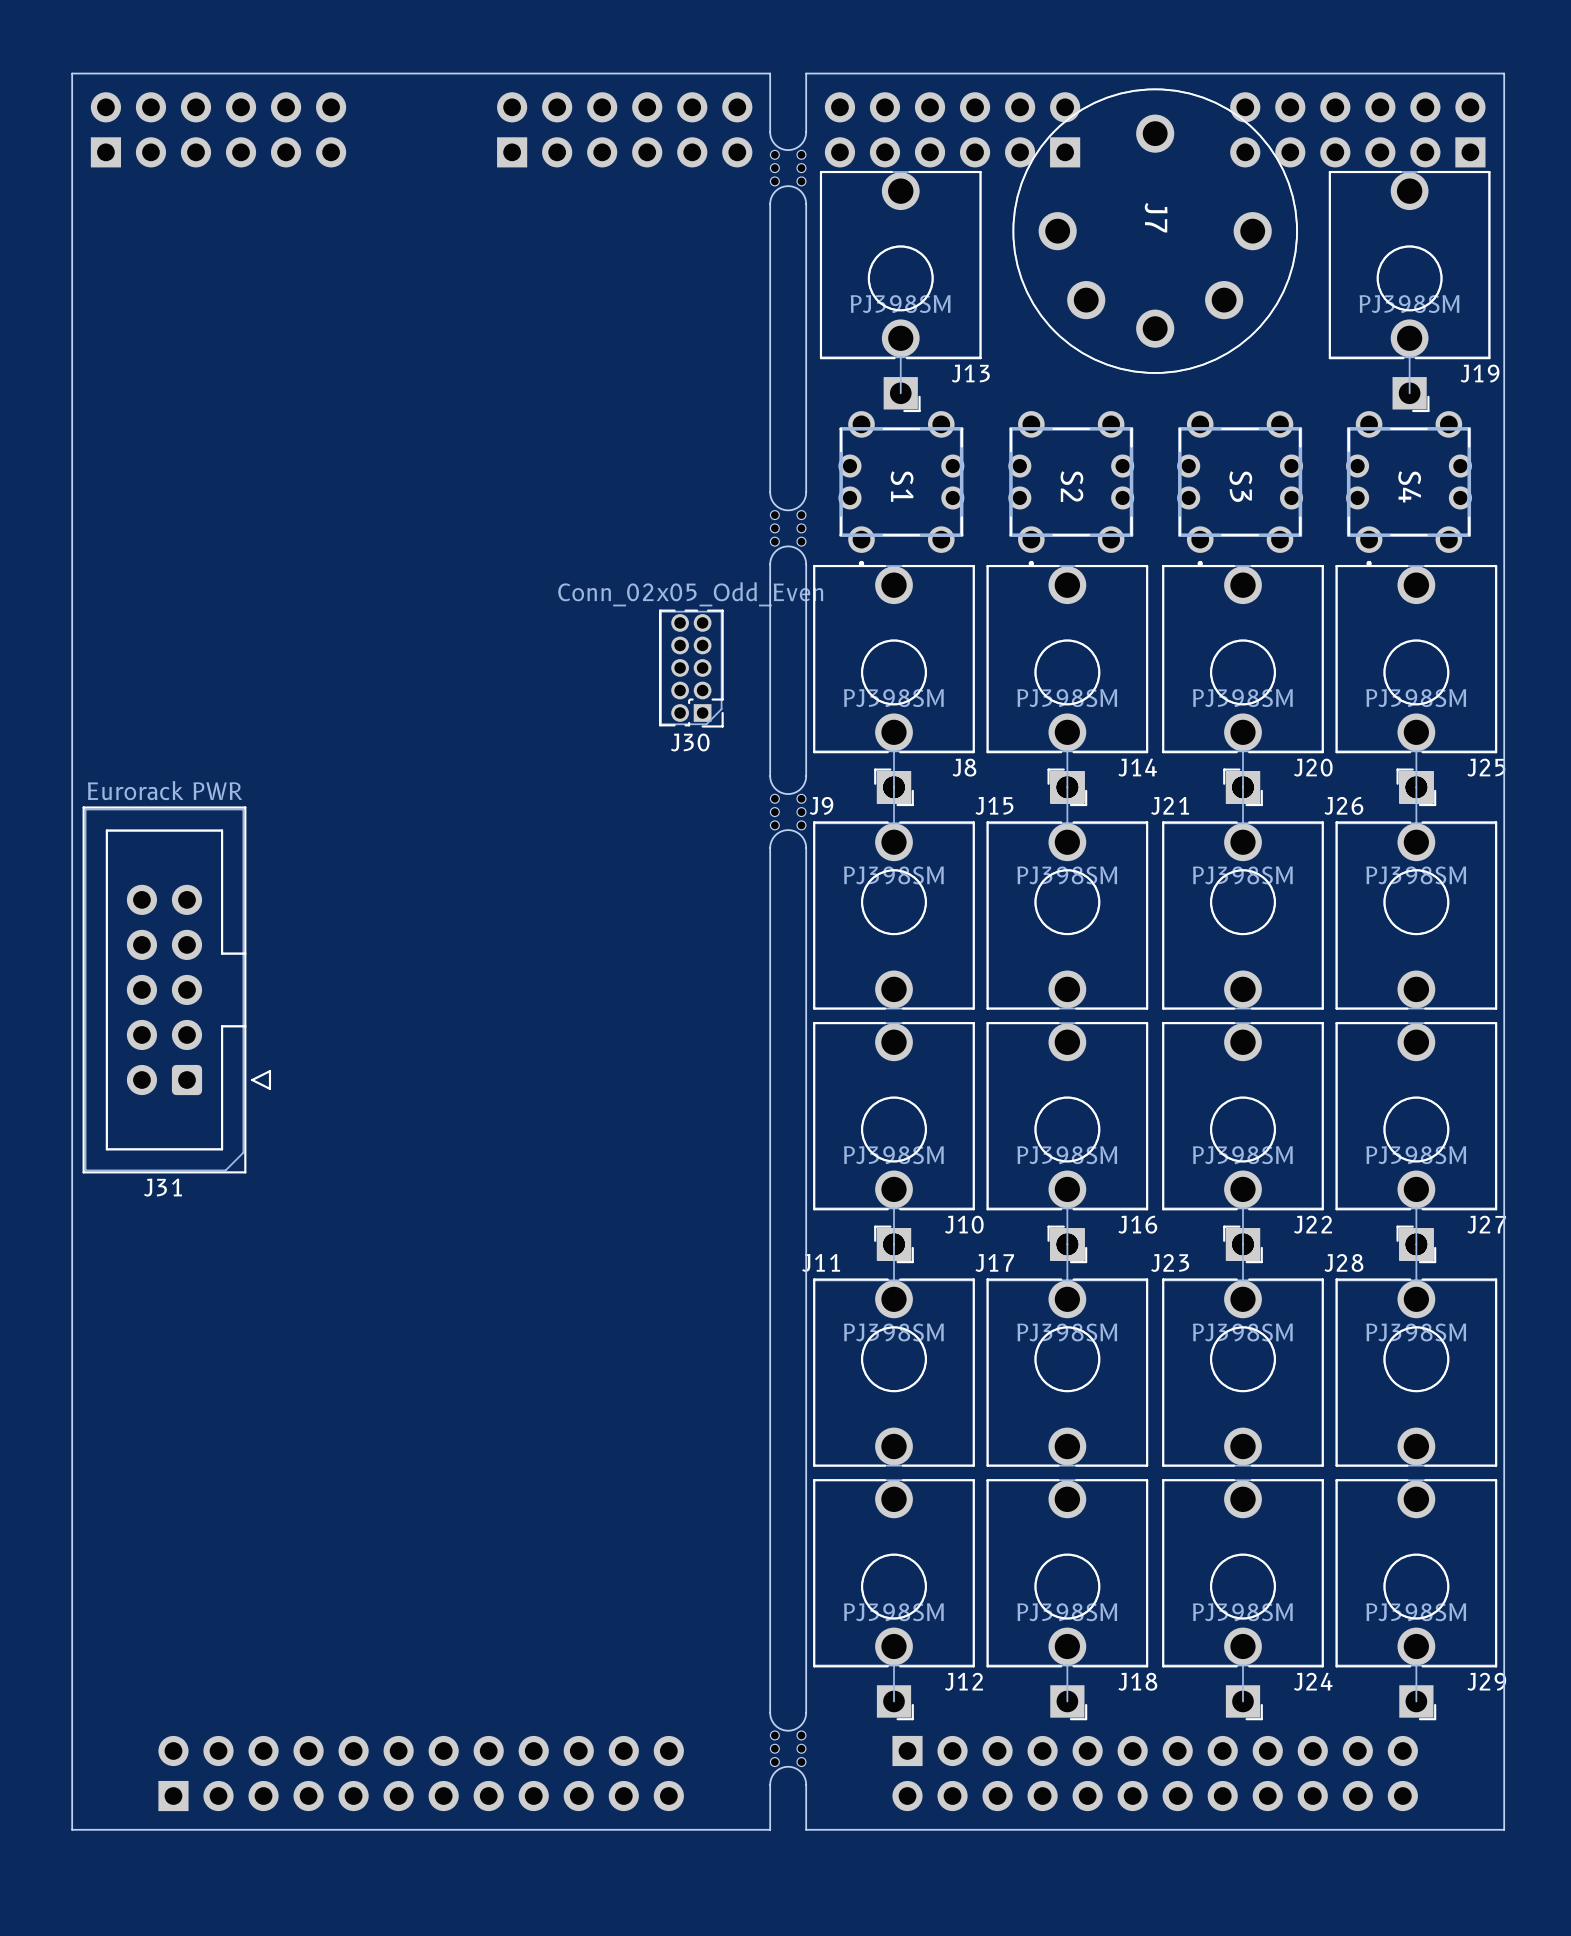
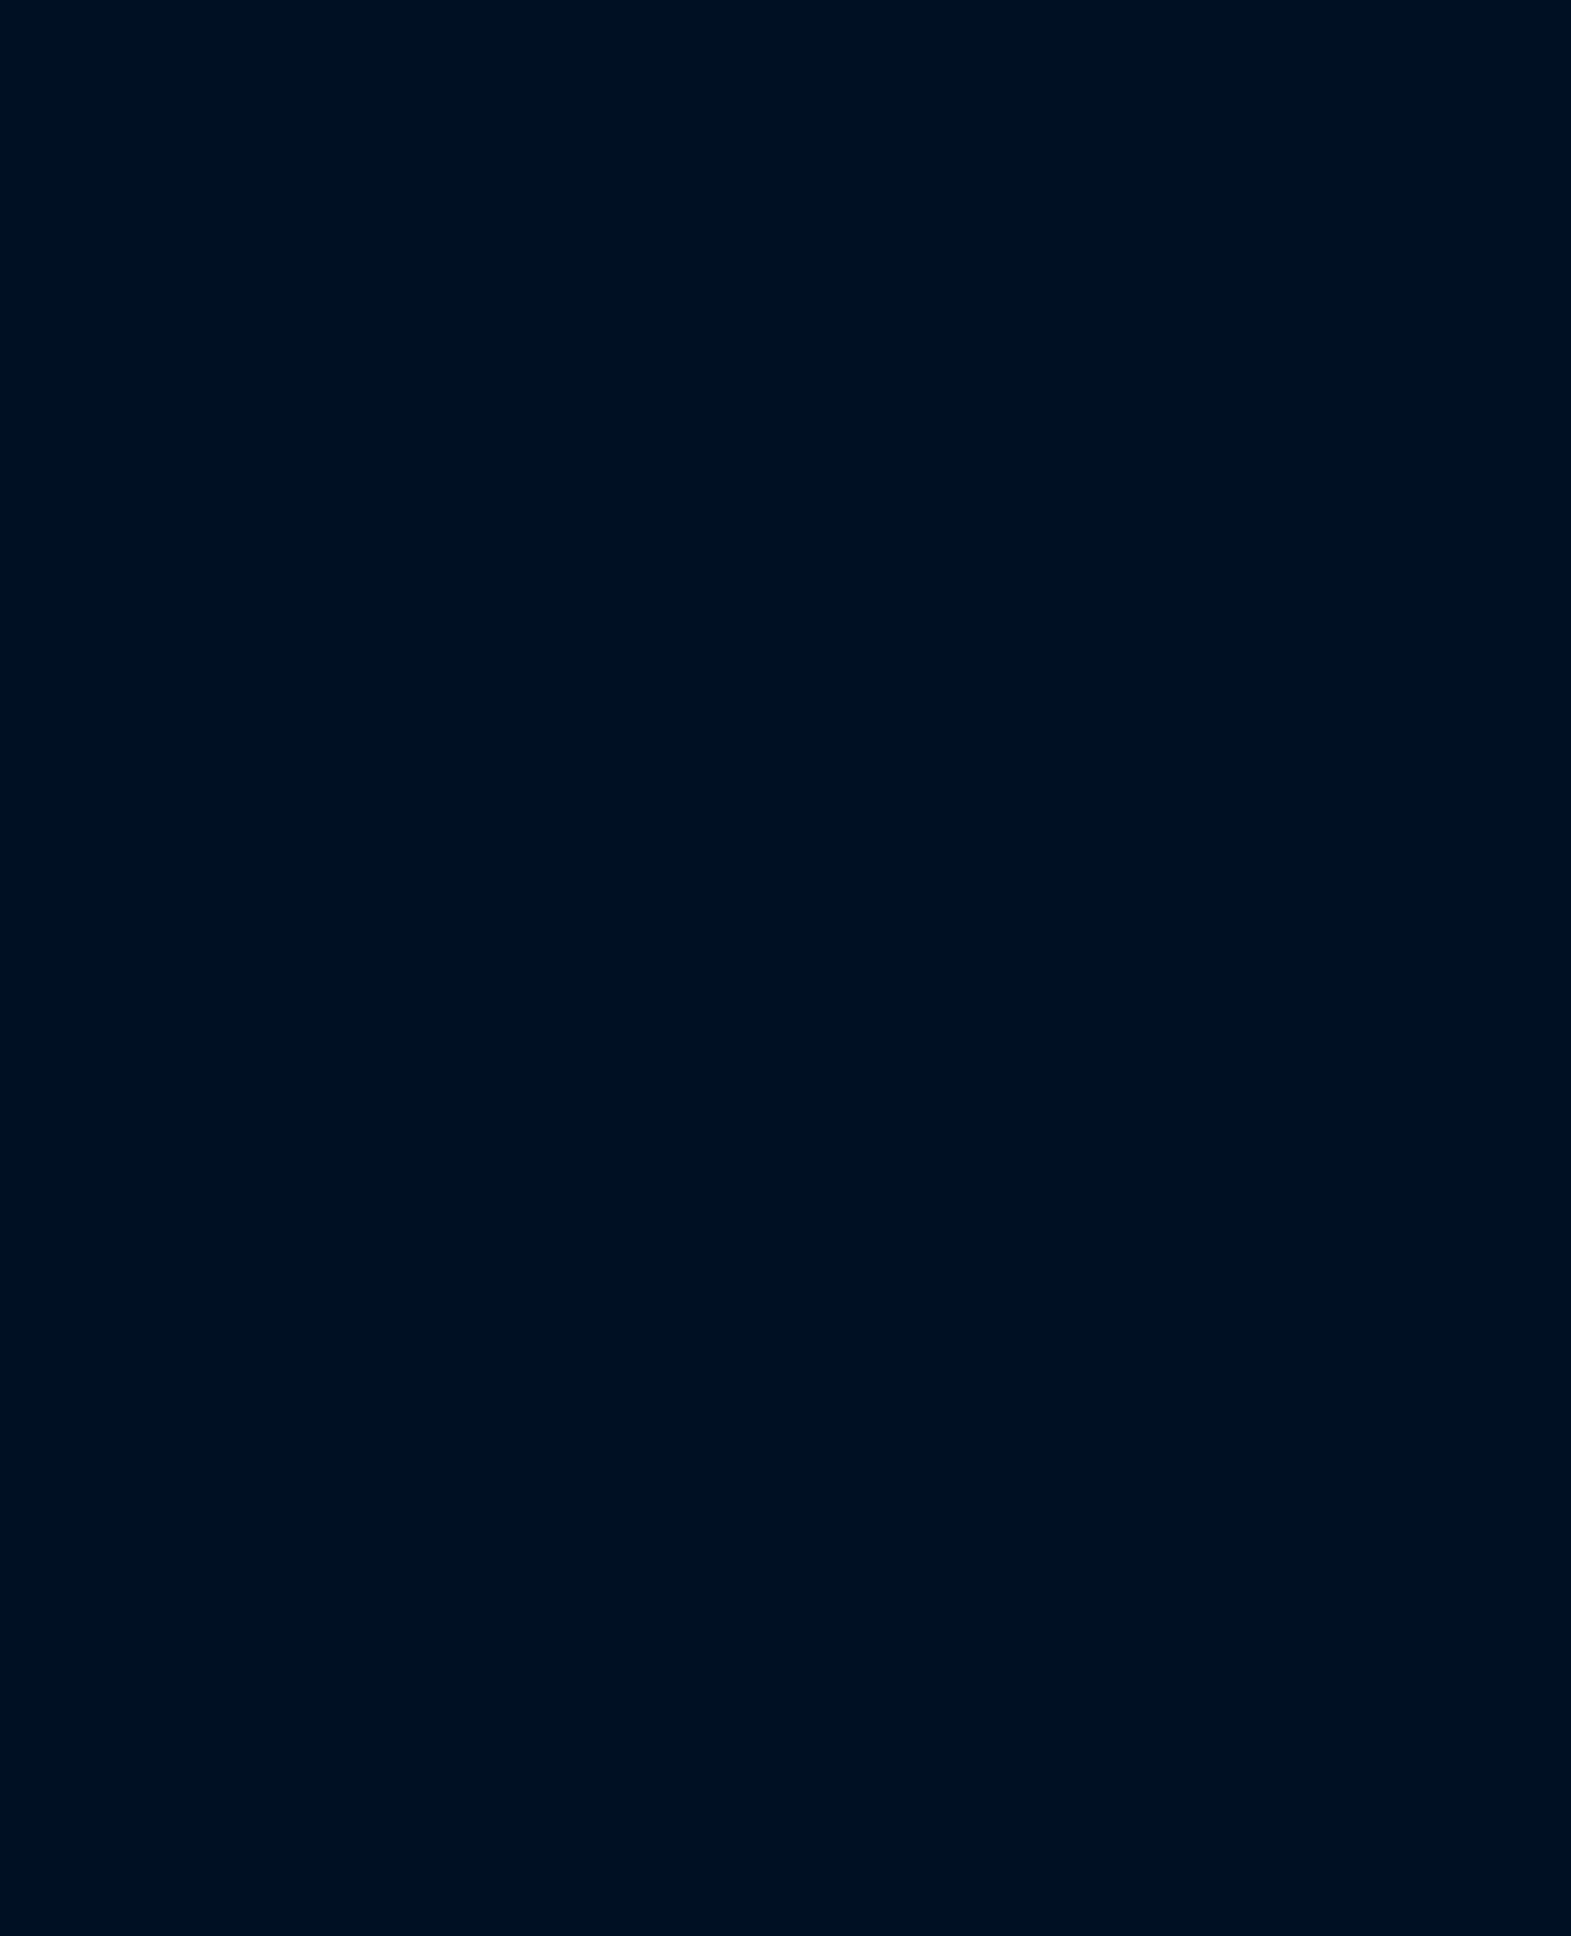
board edge: (1504, 73) (806, 73) (805, 136) (799, 146) (788, 150) (777, 146) (770, 136) (770, 73) (72, 73) (72, 1829) (770, 1829) (770, 1780) (777, 1770) (788, 1766) (799, 1770) (805, 1780) (806, 1829) (1504, 1829) (1504, 73) -> none
part: (218, 129) -> none
part: (624, 129) -> none
part: (952, 129) -> none
part: (1357, 129) -> none
part: (788, 168) -> none
board edge: (806, 204) (806, 492) (800, 505) (788, 510) (775, 505) (770, 492) (770, 204) (775, 191) (788, 186) (800, 191) (806, 204) -> none
J7: (1155, 231) -> none
J13: PJ398SM (900, 291) -> none
J19: PJ398SM (1409, 291) -> none
S1: (901, 488) -> none
S2: (1071, 488) -> none
S3: (1240, 488) -> none
S4: (1408, 488) -> none
part: (788, 528) -> none
board edge: (806, 564) (806, 778) (799, 790) (785, 793) (775, 788) (770, 778) (770, 562) (777, 550) (790, 546) (802, 553) (806, 564) -> none
J30: Conn_02x05_Odd_Even (691, 668) -> none
J8: PJ398SM (894, 685) -> none
J14: PJ398SM (1067, 685) -> none
J20: PJ398SM (1243, 685) -> none
J25: PJ398SM (1416, 685) -> none
part: (788, 812) -> none
board edge: (806, 848) (806, 1712) (800, 1725) (788, 1730) (775, 1725) (770, 1712) (770, 848) (775, 835) (788, 830) (800, 835) (806, 848) -> none
J9: PJ398SM (894, 889) -> none
J15: PJ398SM (1067, 889) -> none
J21: PJ398SM (1243, 889) -> none
J26: PJ398SM (1416, 889) -> none
J31: Eurorack PWR (176, 989) -> none
J10: PJ398SM (894, 1142) -> none
J16: PJ398SM (1067, 1142) -> none
J22: PJ398SM (1243, 1142) -> none
J27: PJ398SM (1416, 1142) -> none
J11: PJ398SM (894, 1346) -> none
J17: PJ398SM (1067, 1346) -> none
J23: PJ398SM (1243, 1346) -> none
J28: PJ398SM (1416, 1346) -> none
J12: PJ398SM (894, 1599) -> none
J18: PJ398SM (1067, 1599) -> none
J24: PJ398SM (1243, 1599) -> none
J29: PJ398SM (1416, 1599) -> none
part: (788, 1748) -> none
part: (421, 1773) -> none
part: (1155, 1773) -> none

